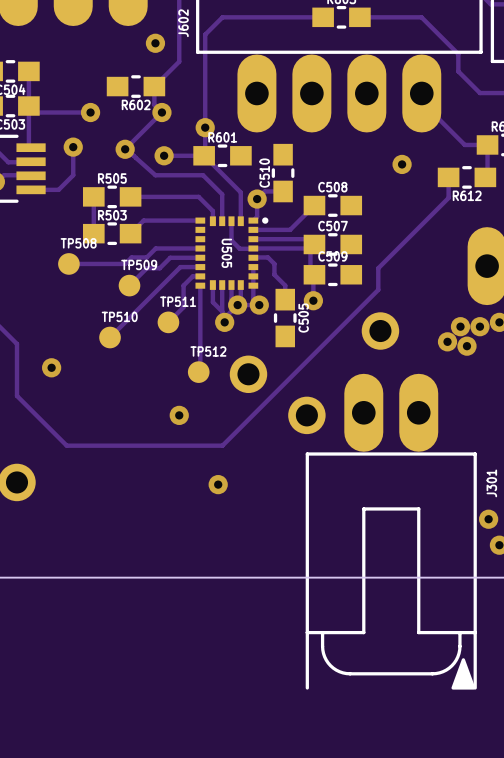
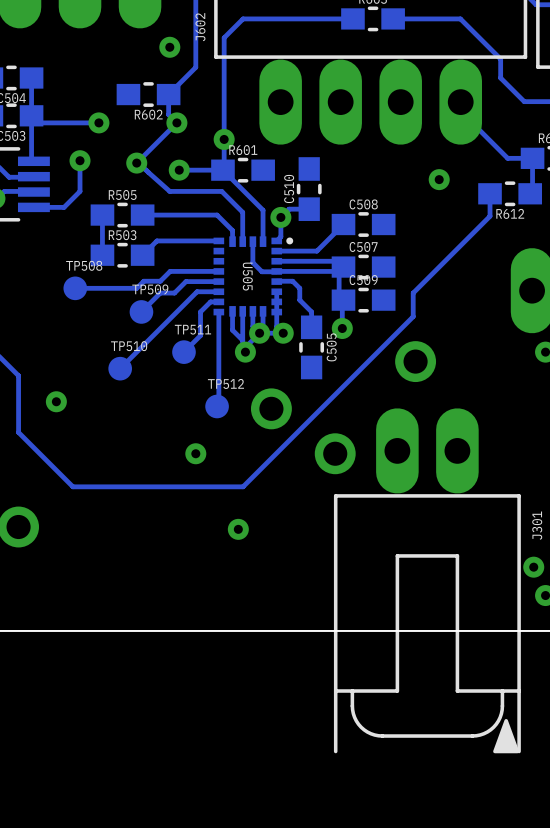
via: (460, 326) -> none
via: (479, 326) -> none
via: (447, 341) -> none
via: (466, 346) -> none

